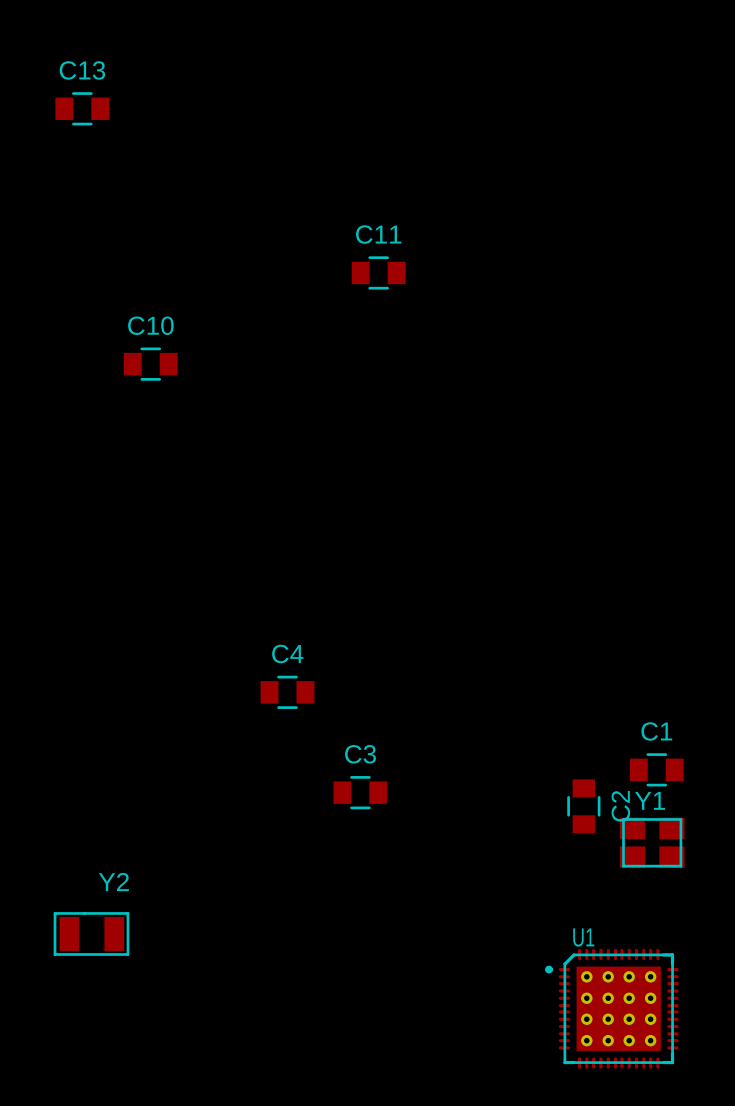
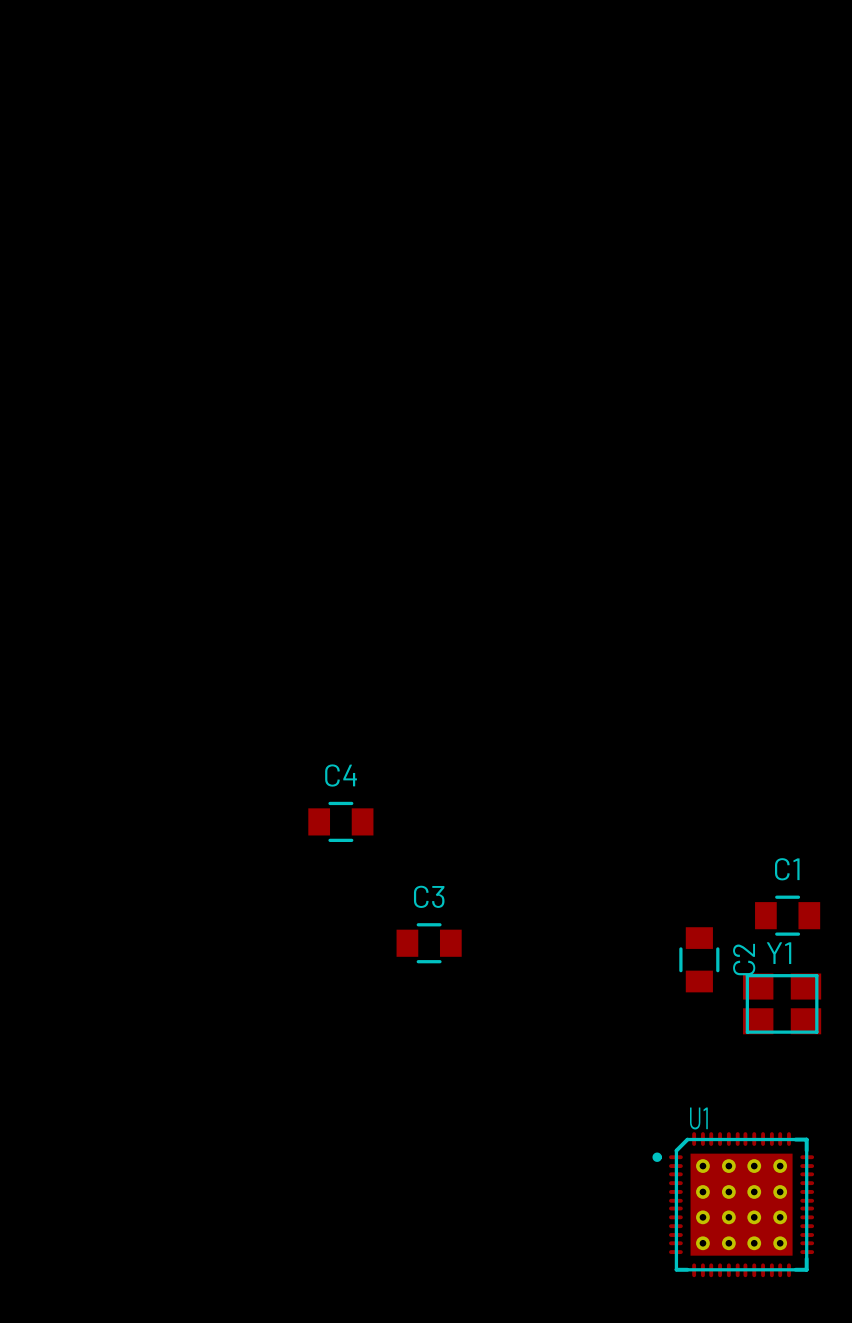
C13: (82, 108) -> none
C11: (378, 272) -> none
C10: (150, 364) -> none
Y2: (91, 933) -> none

